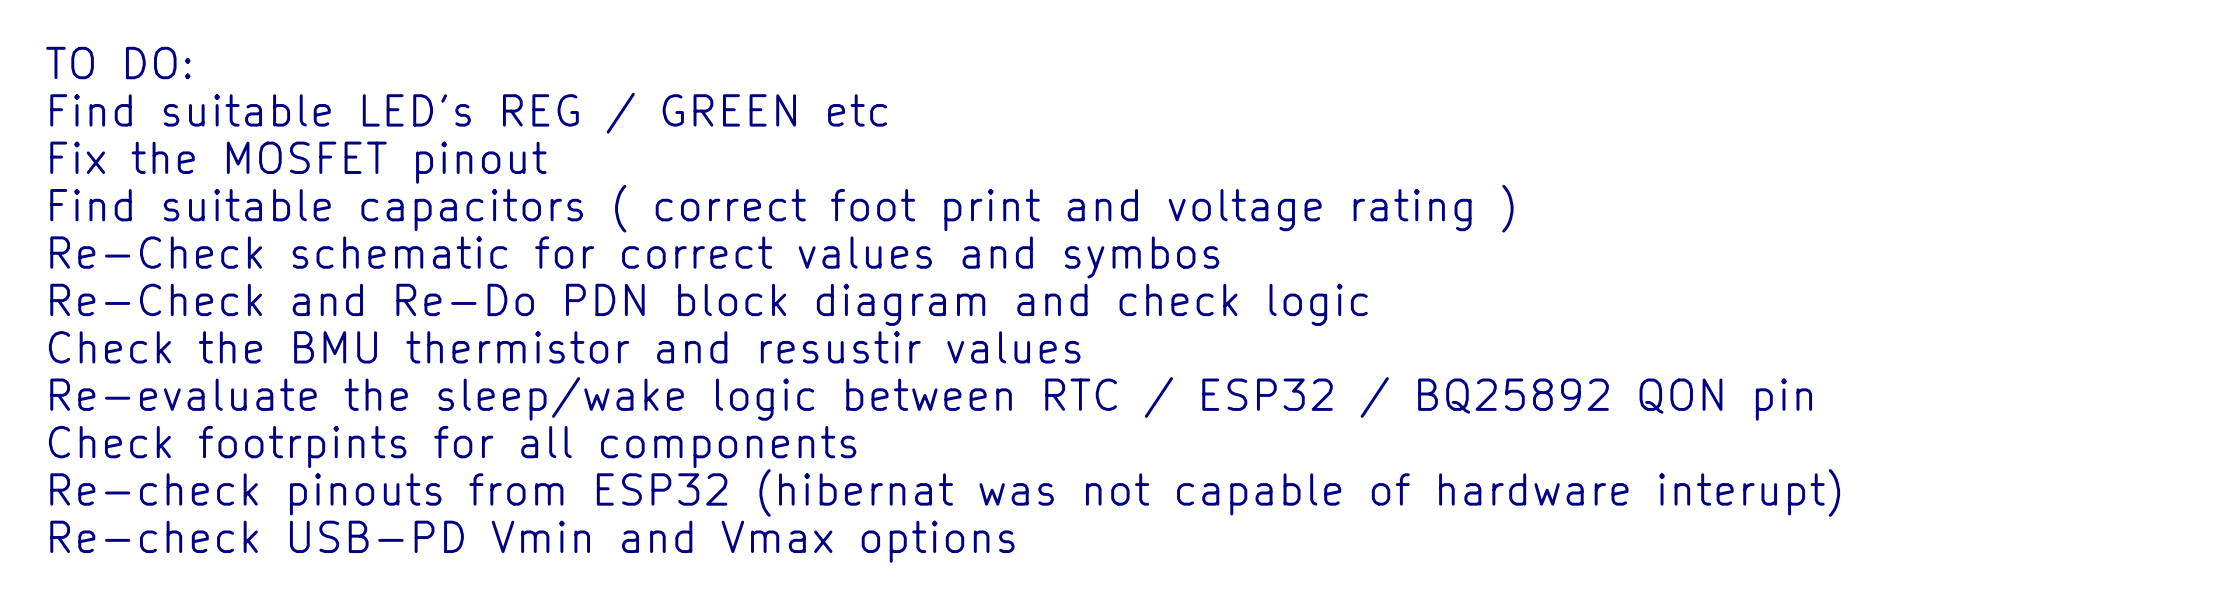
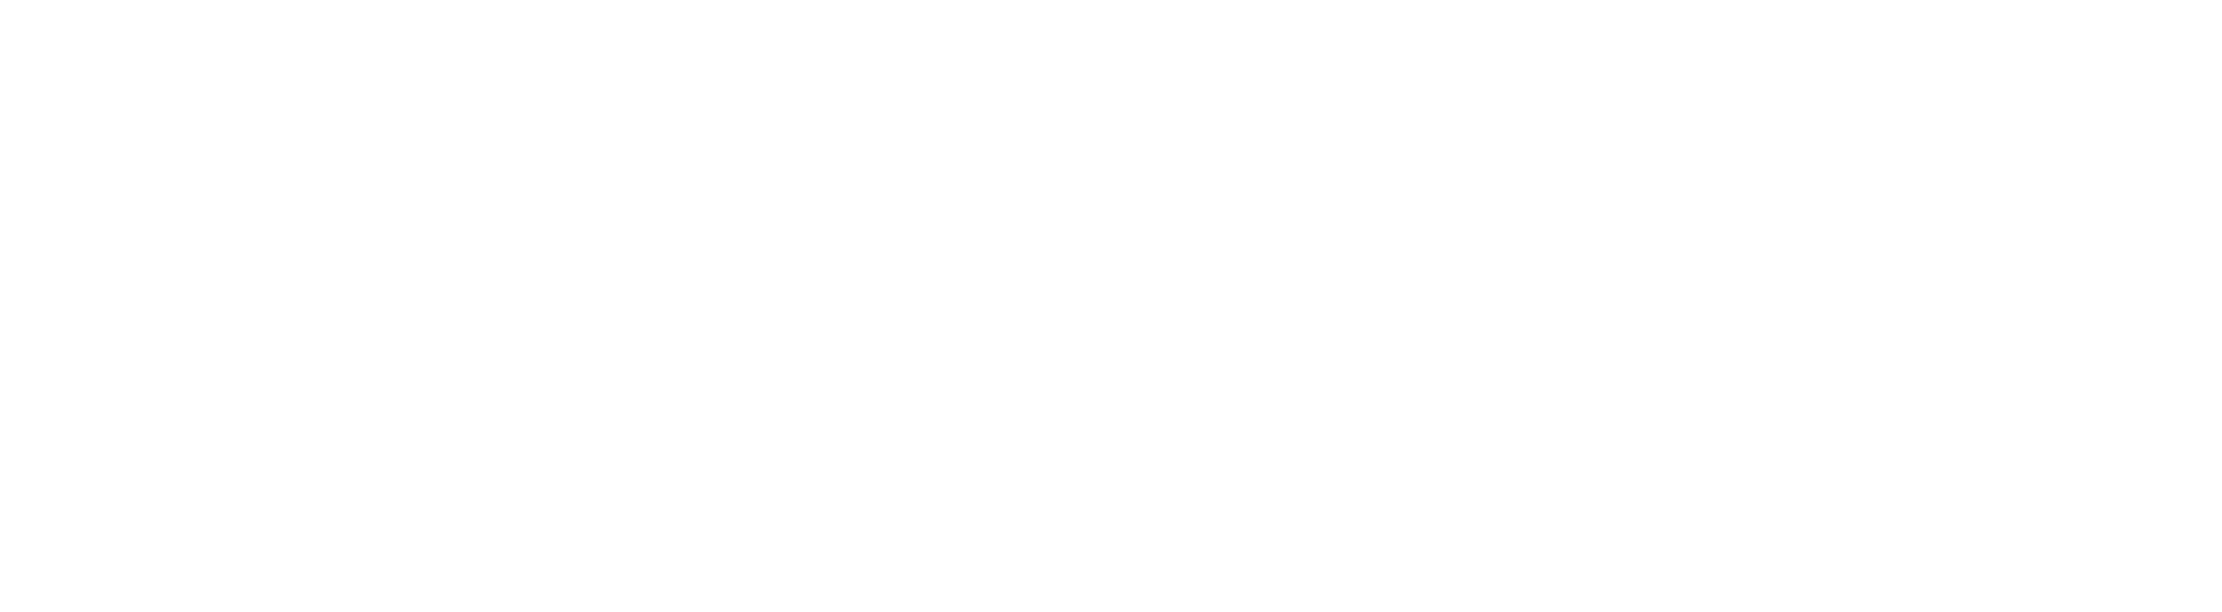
text: TO DO: (118, 63) -> none
text: Find suitable LED's REG / GREEN etc (468, 113) -> none
text: Fix the MOSFET pinout (298, 162) -> none
text: Find suitable capacitors ( correct foot print and voltage rating ) (781, 208) -> none
text: Re-Check schematic for correct values and symbos (634, 257) -> none
text: Re-Check and Re-Do PDN block diagram and check logic (709, 304) -> none
text: Check the BMU thermistor and resustir values (564, 347) -> none
text: Re-evaluate the sleep/wake logic between RTC / ESP32 / BQ25892 QON pin (931, 398) -> none
text: Check footrpints for all components (452, 447) -> none
text: Re-check pinouts from ESP32 (hibernat was not capable of hardware interupt) (945, 492) -> none
text: Re-check USB-PD Vmin and Vmax options (532, 541) -> none

